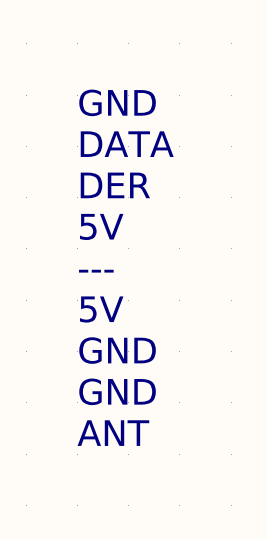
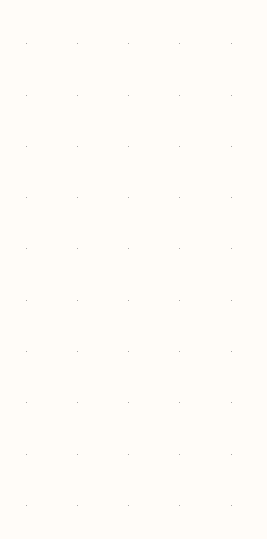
text: GND (117, 102) -> none
text: DATA (127, 144) -> none
text: DER (115, 185) -> none
text: 5V (101, 226) -> none
text: --- (96, 271) -> none
text: 5V (101, 309) -> none
text: GND (117, 350) -> none
text: GND (117, 391) -> none
text: ANT (113, 433) -> none

